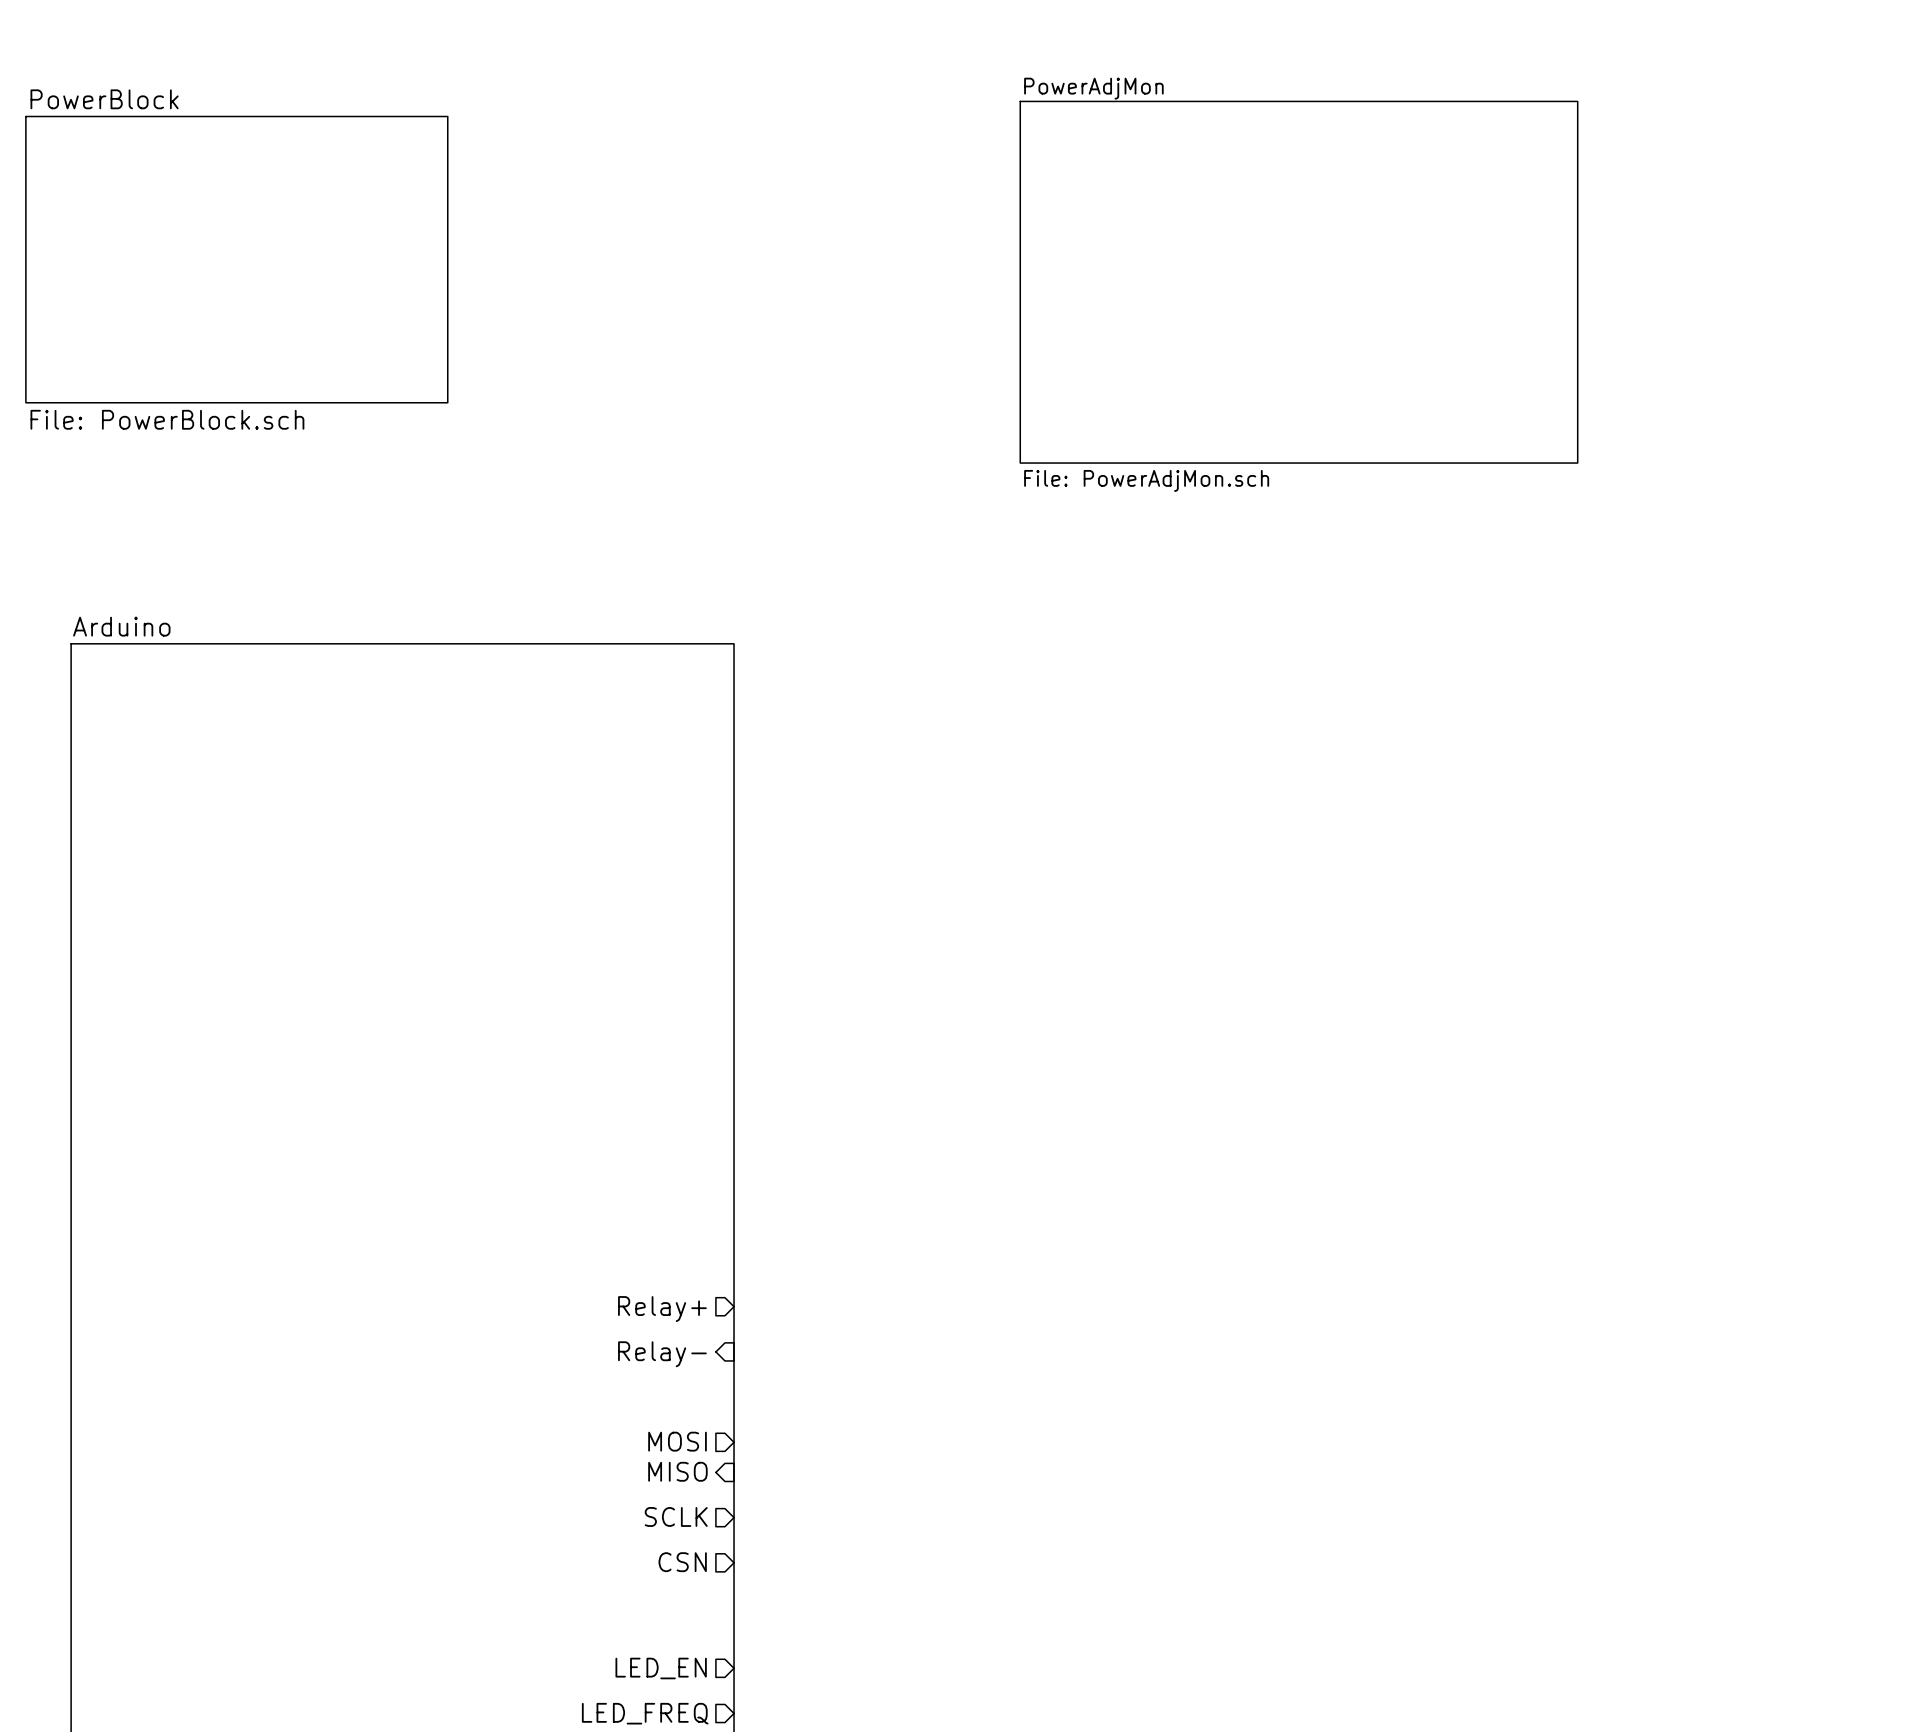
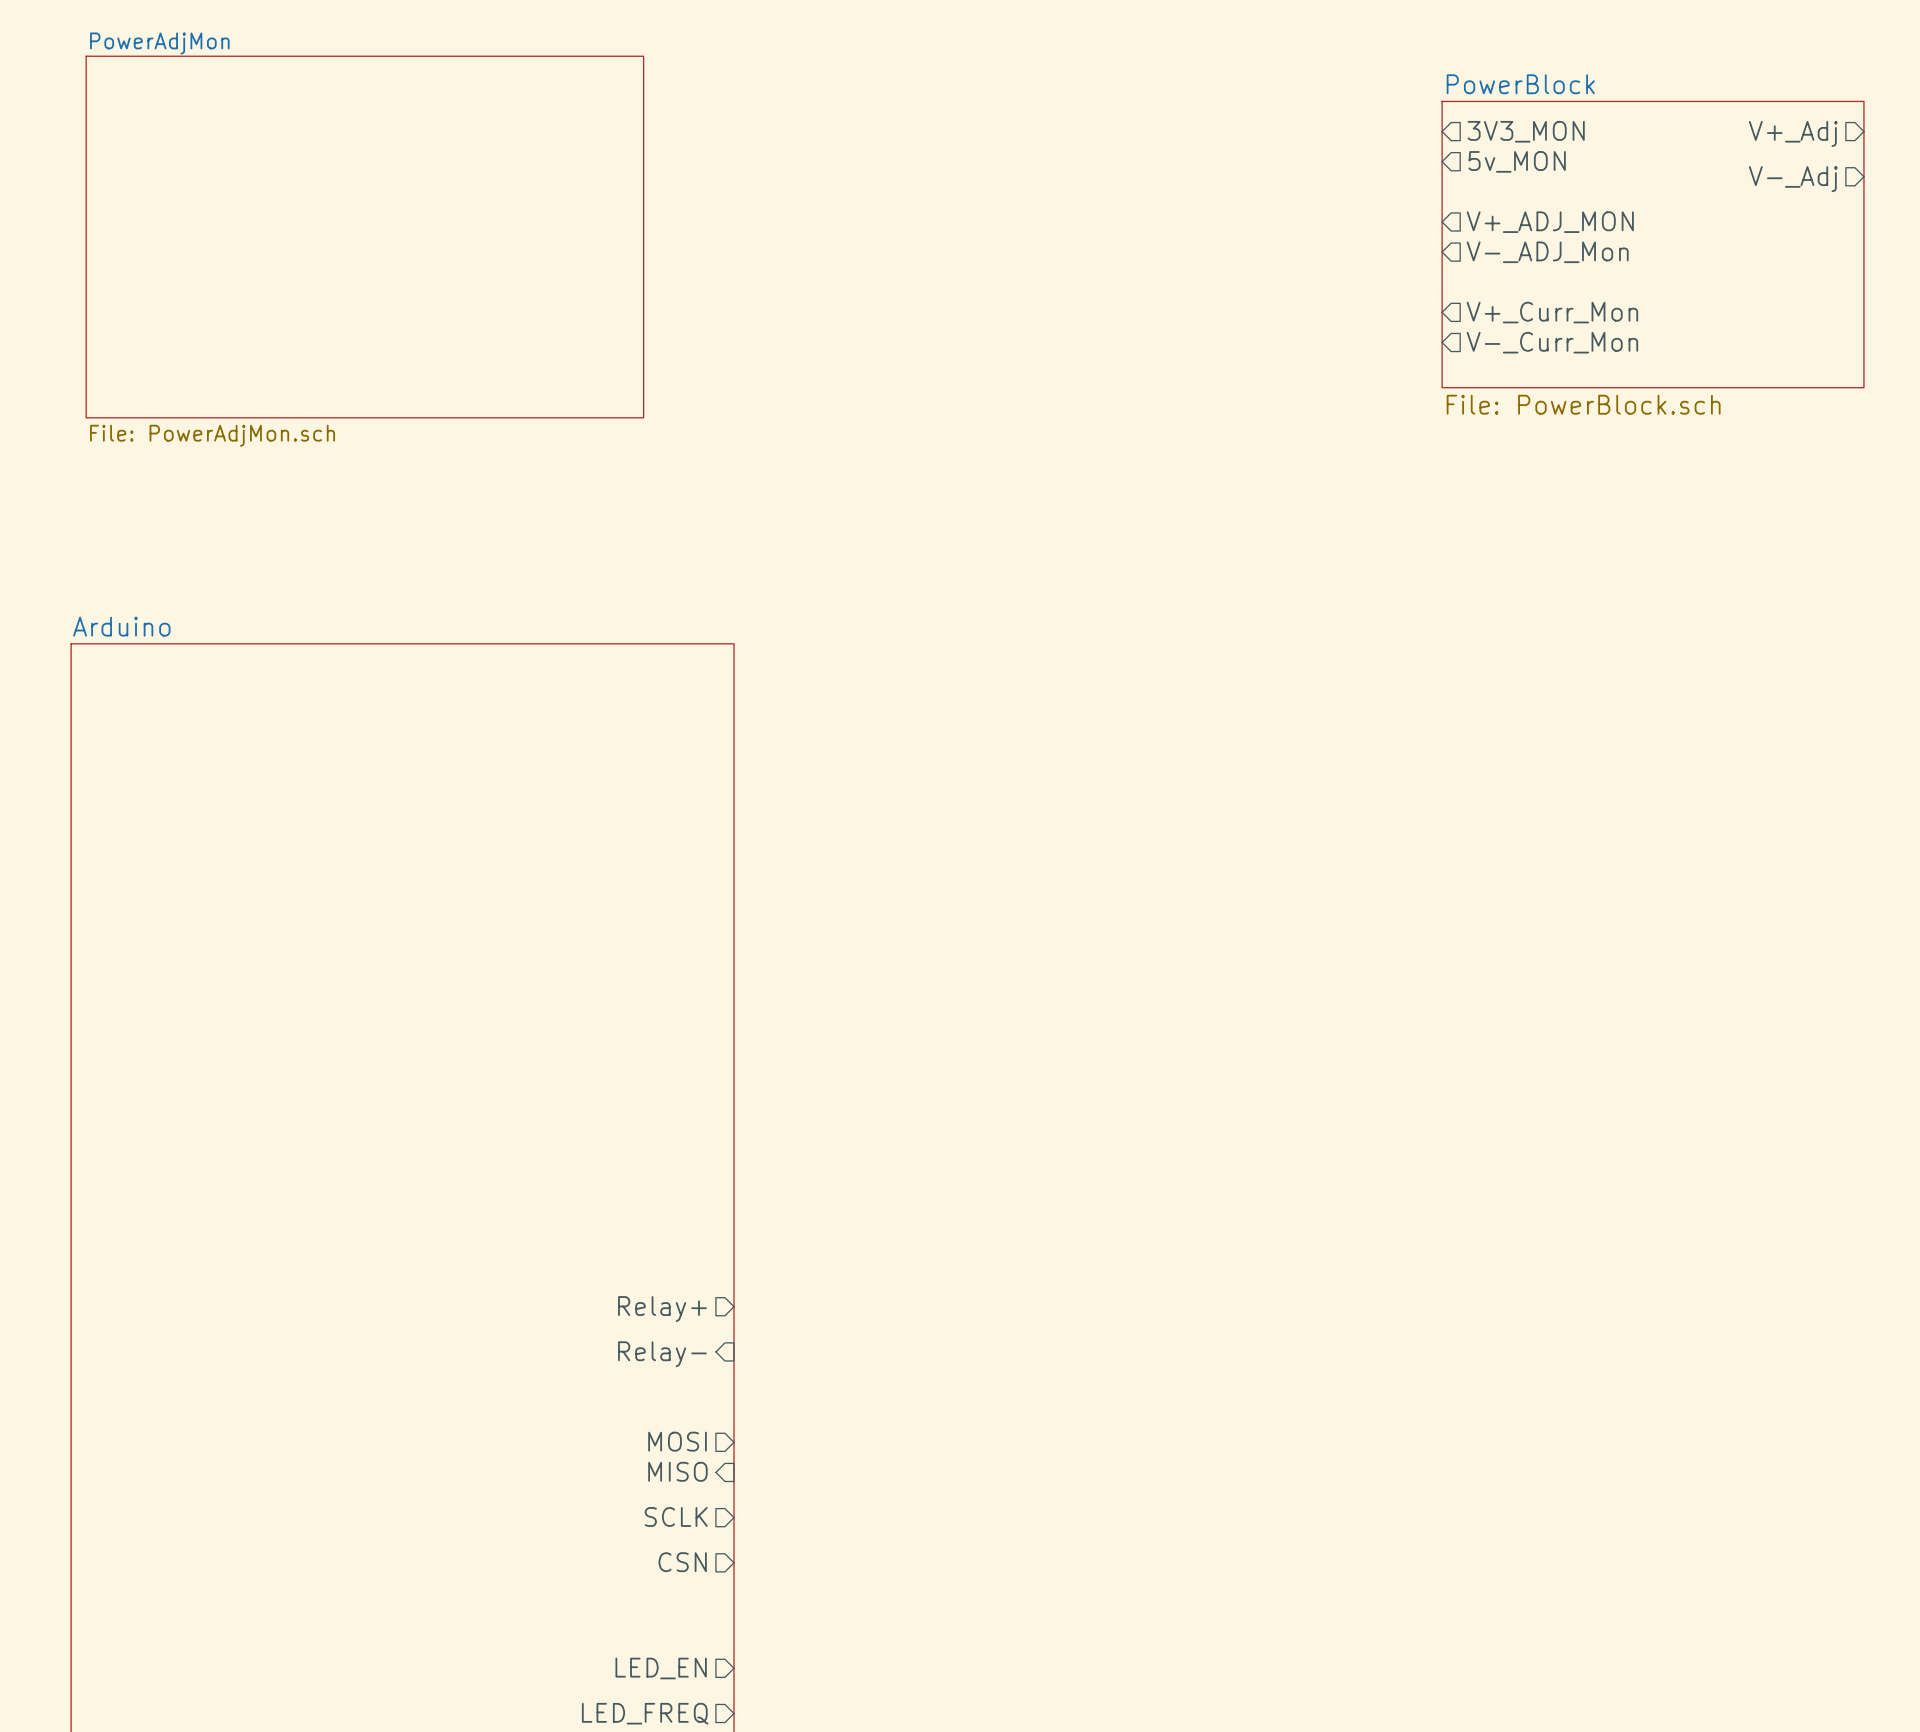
sheet pin: none -> 3V3_MON (1526, 131)
sheet pin: none -> V+_Adj (1793, 133)
sheet pin: none -> 5v_MON (1517, 161)
sheet pin: none -> V-_Adj (1793, 179)
sheet pin: none -> V+_ADJ_MON (1550, 222)
sheet PowerAdjMon: none -> File: PowerAdjMon.sch (364, 237)
sheet PowerBlock: none -> File: PowerBlock.sch (1653, 244)
sheet pin: none -> V-_ADJ_Mon (1547, 252)
sheet PowerBlock: File: PowerBlock.sch (236, 259) -> none
sheet PowerAdjMon: File: PowerAdjMon.sch (1298, 282) -> none
sheet pin: none -> V+_Curr_Mon (1552, 312)
sheet pin: none -> V-_Curr_Mon (1552, 342)

